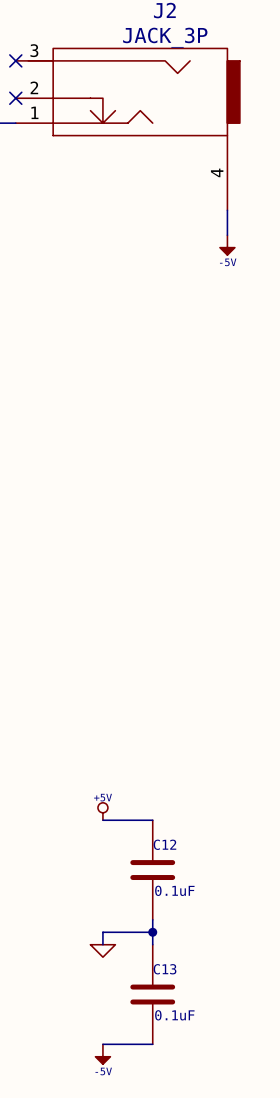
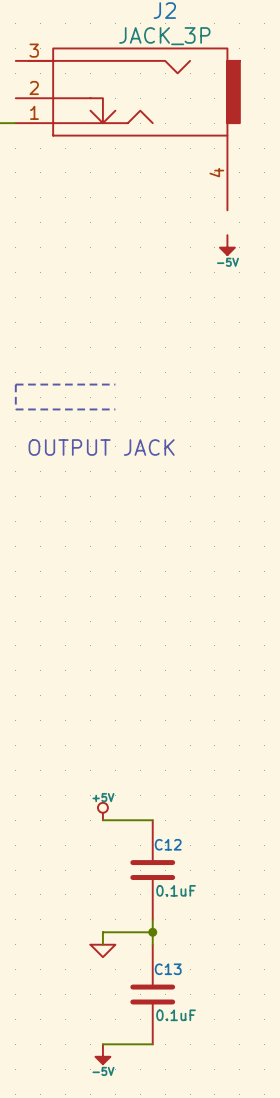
no-connect mark: (15, 60) -> none
no-connect mark: (15, 98) -> none
wire: (227, 210) (227, 235) -> none
line: none -> (115, 384) (15, 384) (15, 409) (115, 409)
text: none -> OUTPUT JACK (101, 447)

